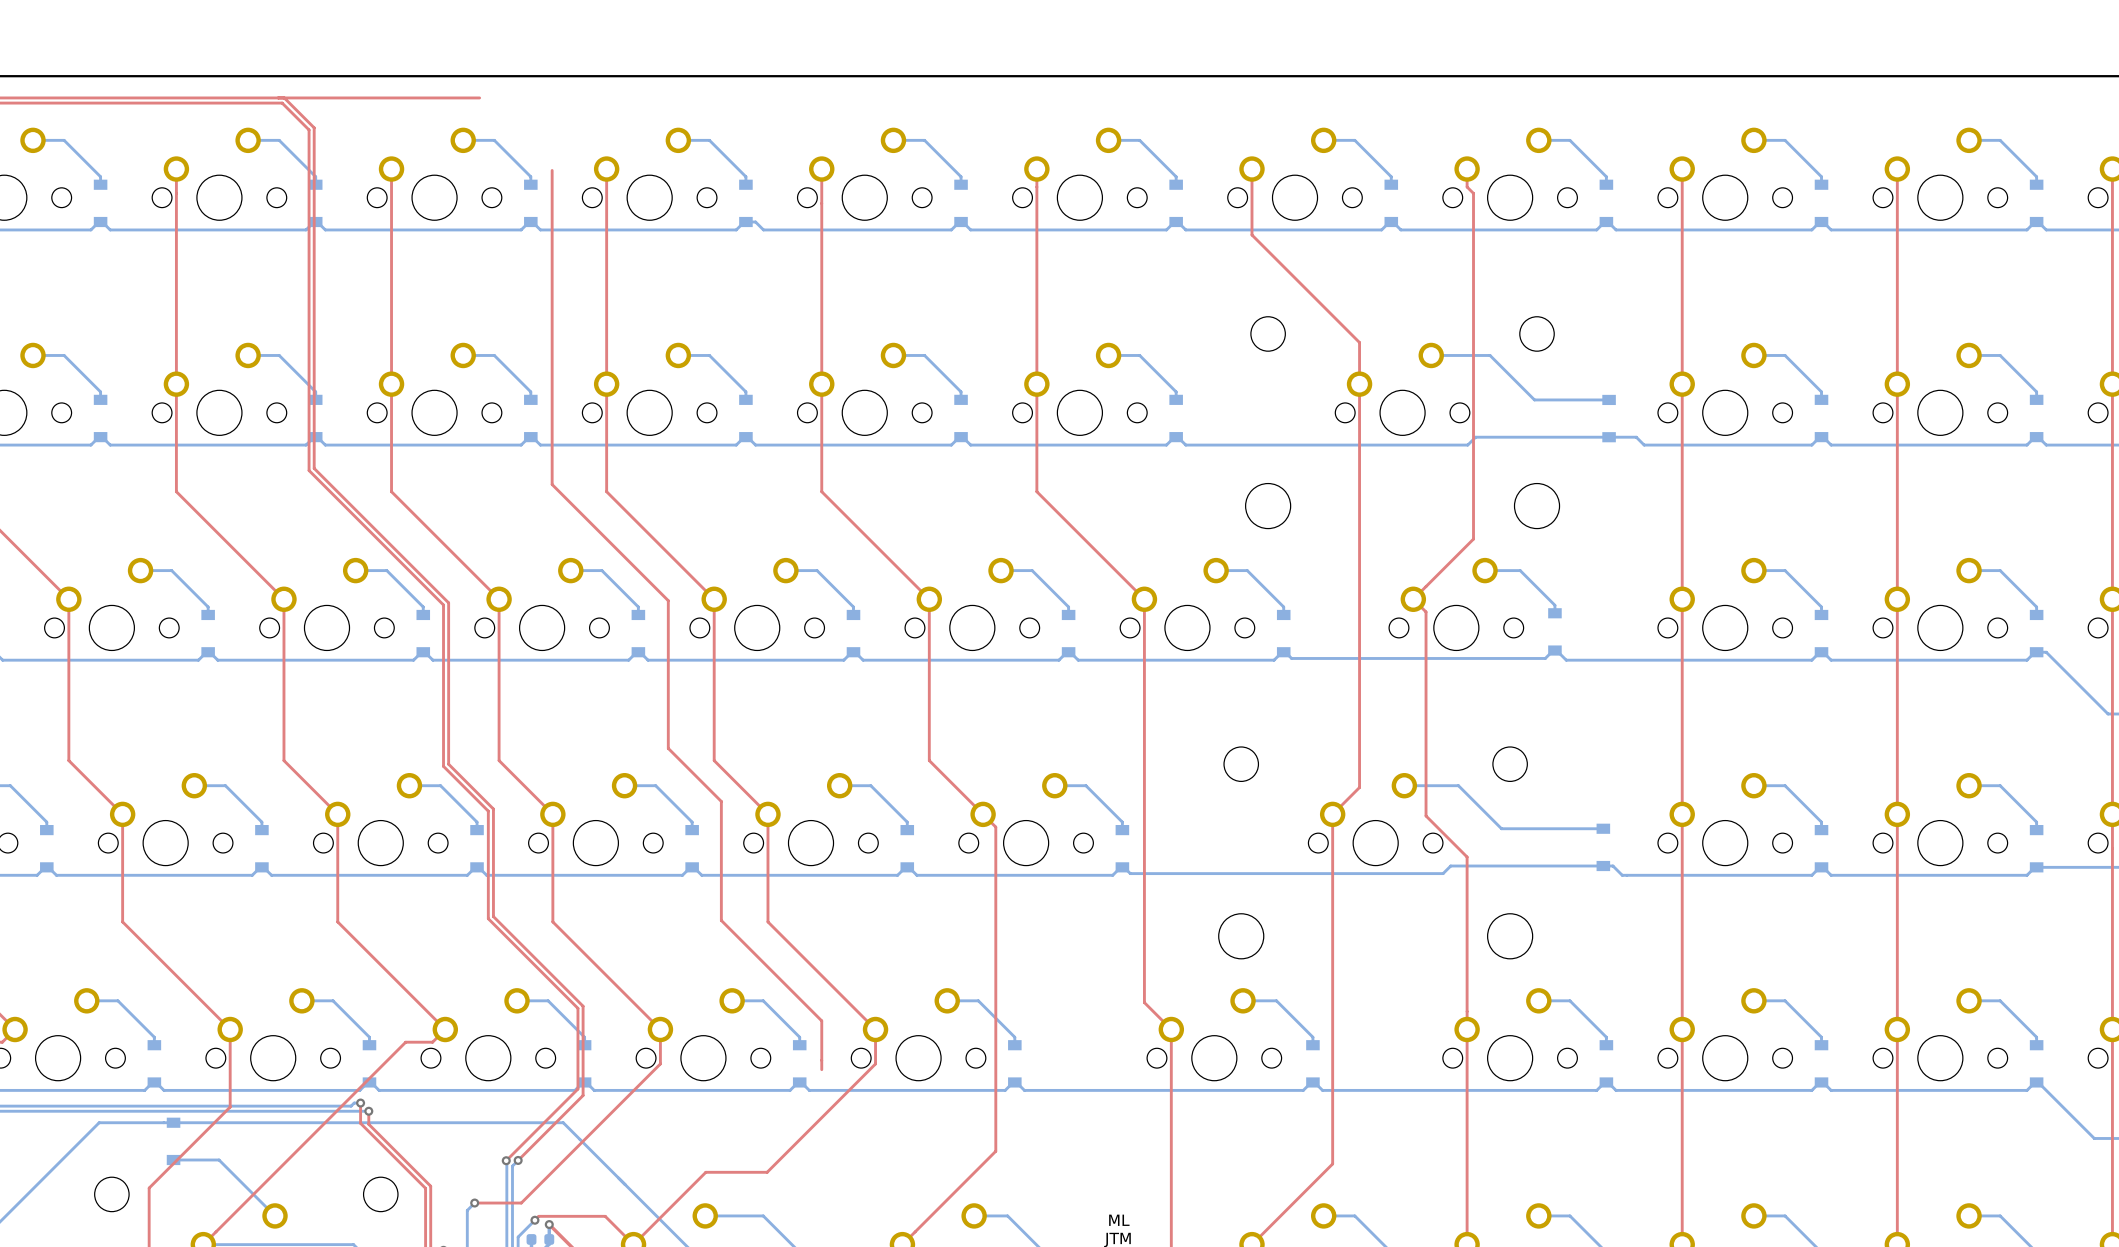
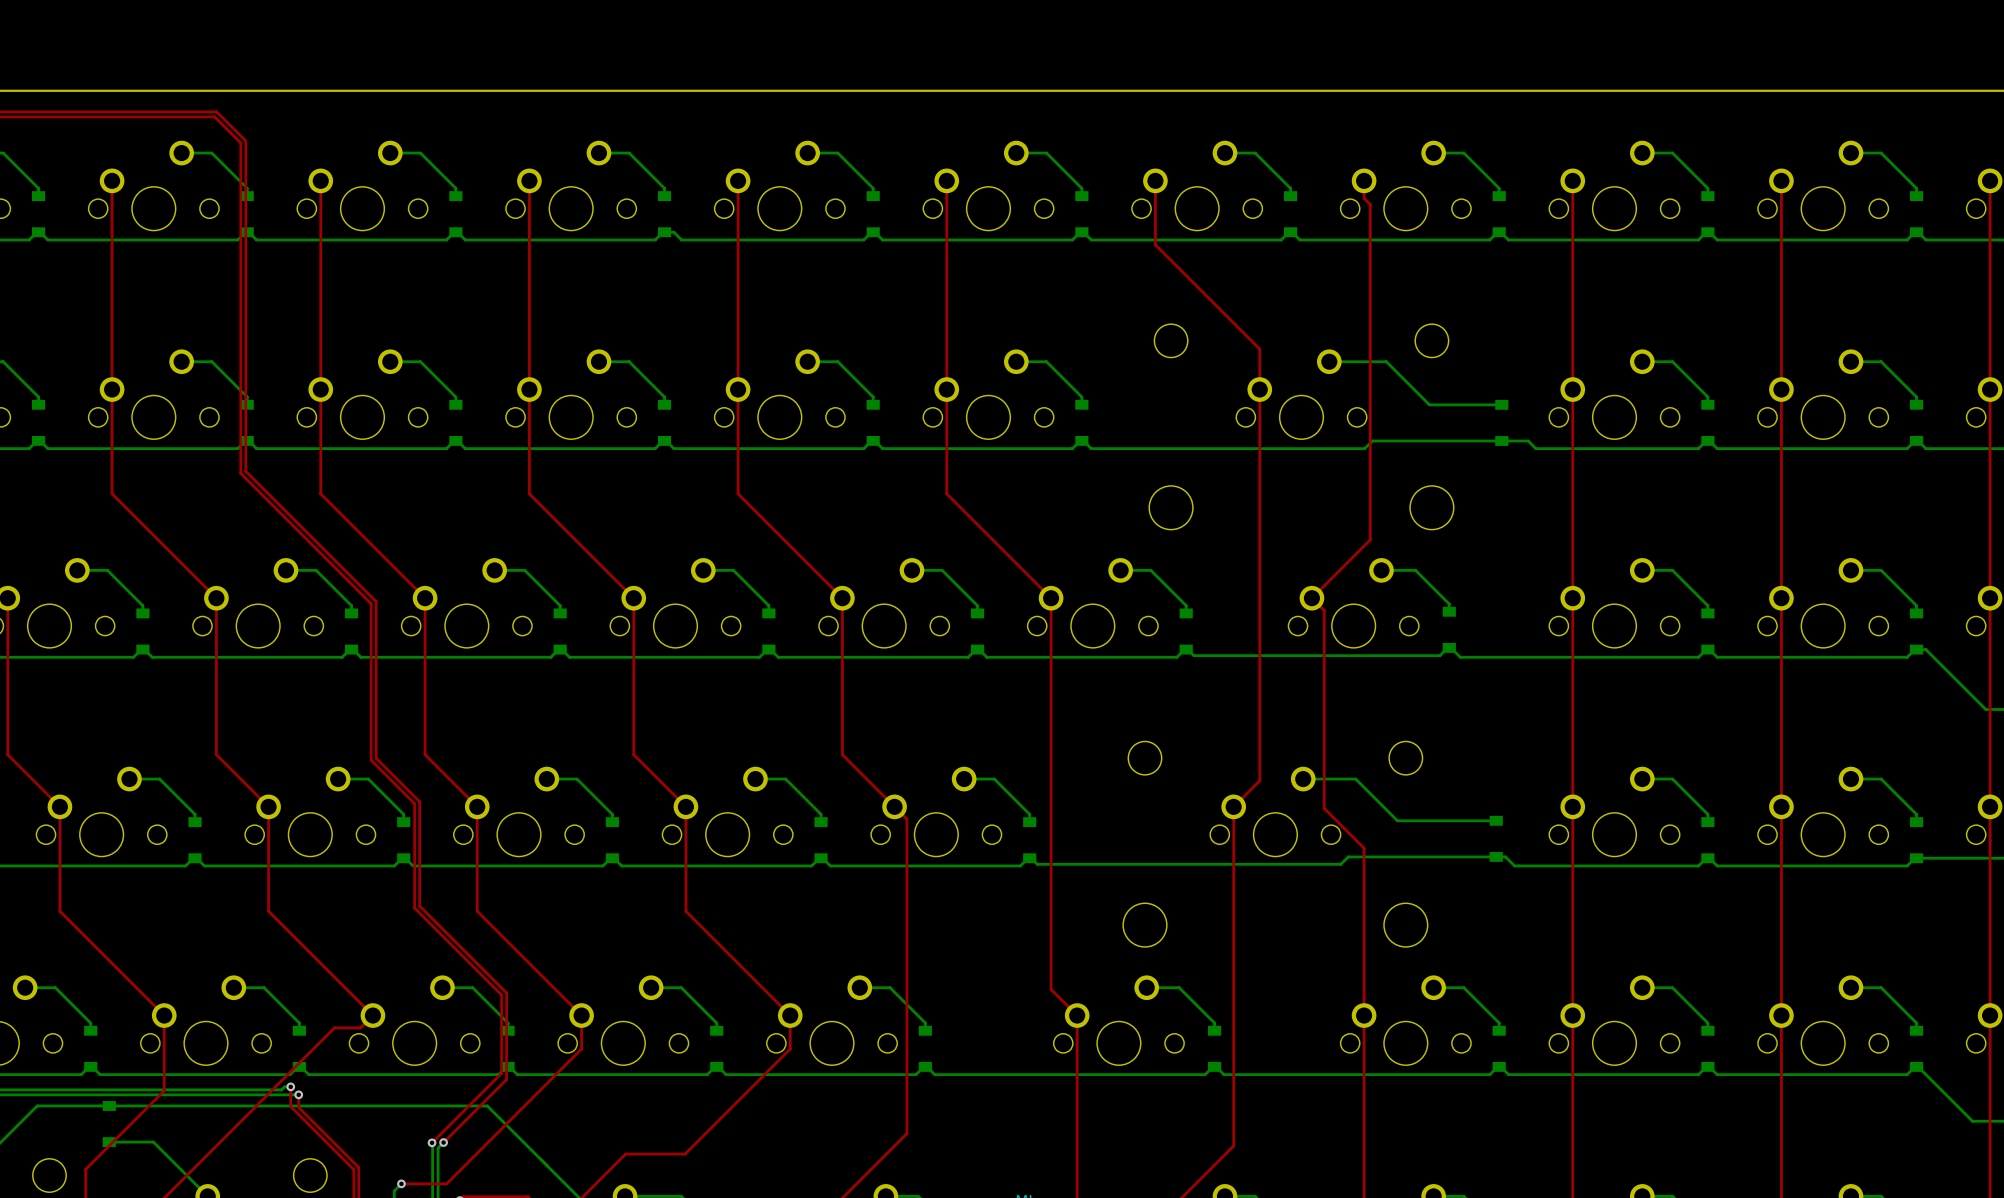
top track: (284, 97) (479, 97) -> none
top track: (552, 170) (552, 484) (668, 600) (668, 748) (721, 801) (721, 920) (821, 1020) (821, 1069) -> none

